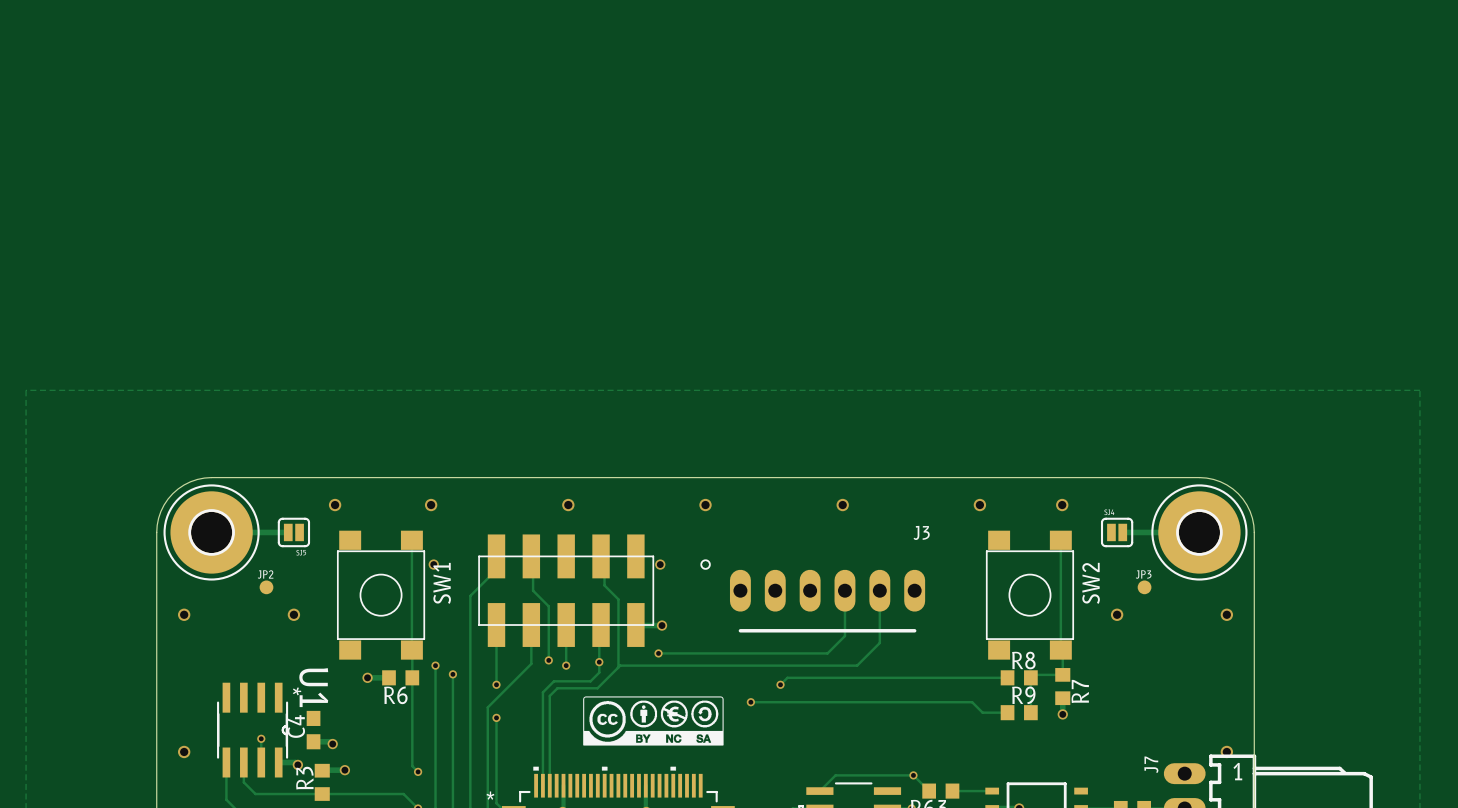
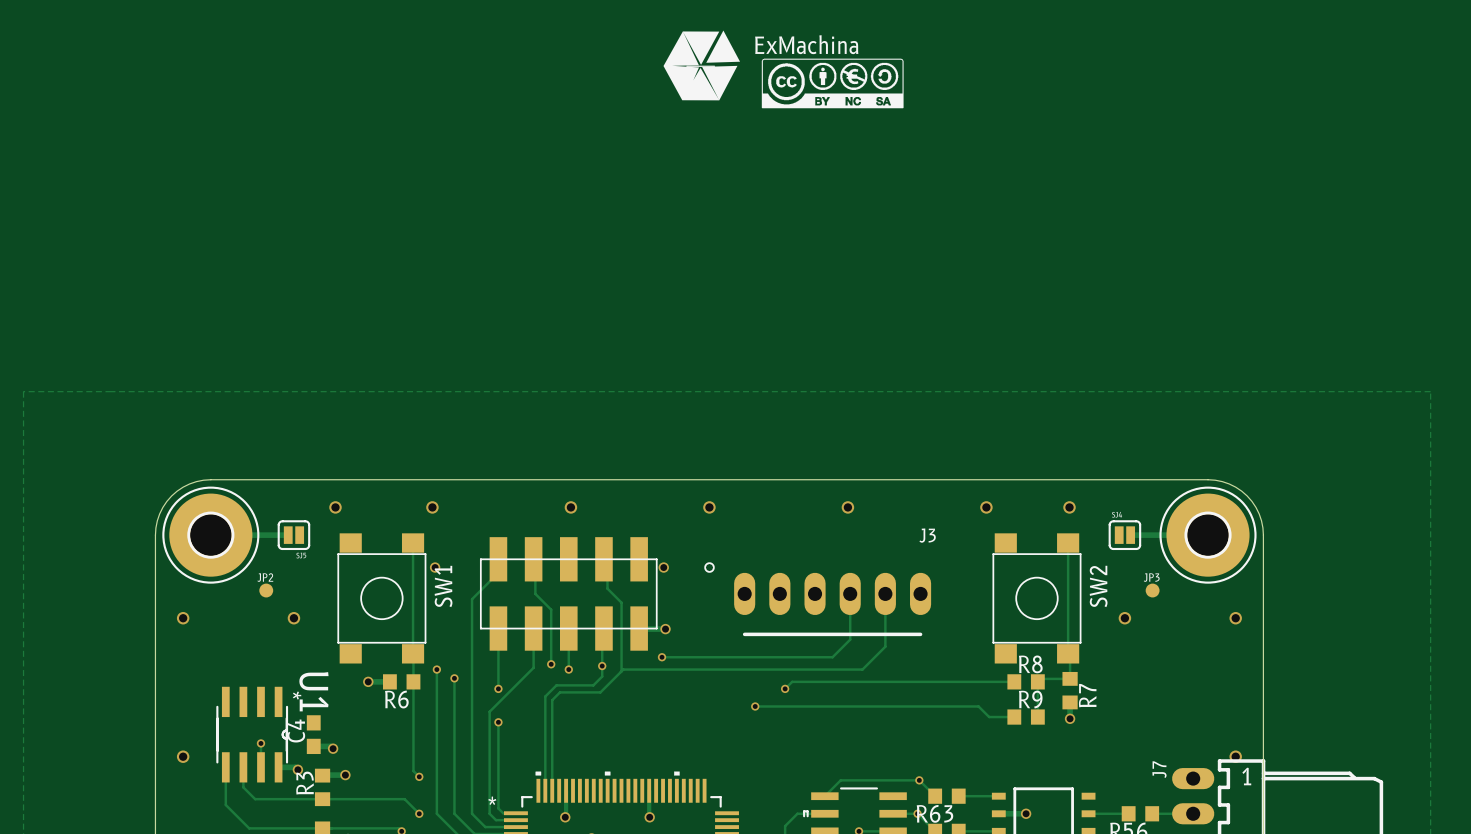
drawing: none -> [663, 30, 904, 109]
drawing: [583, 696, 724, 746] -> none

